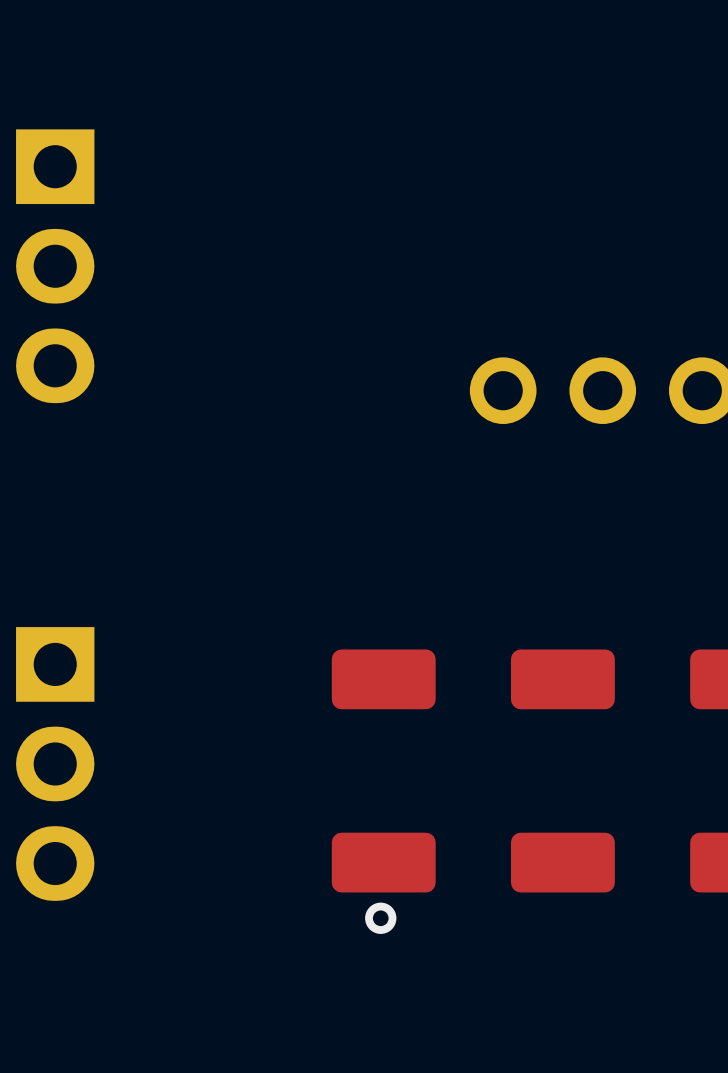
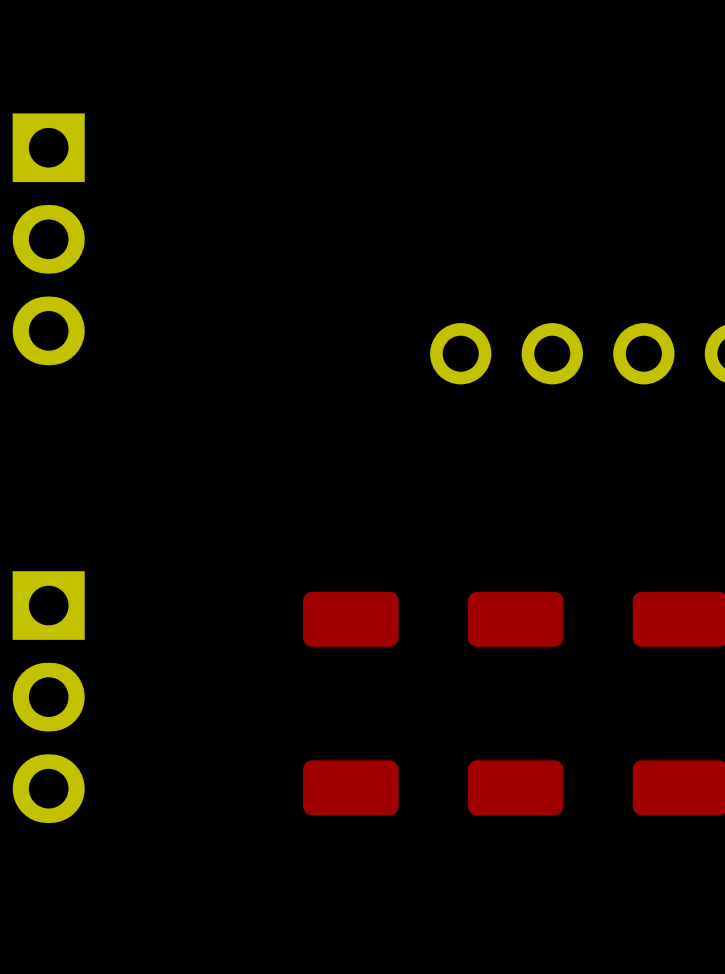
via: (380, 918) -> none

